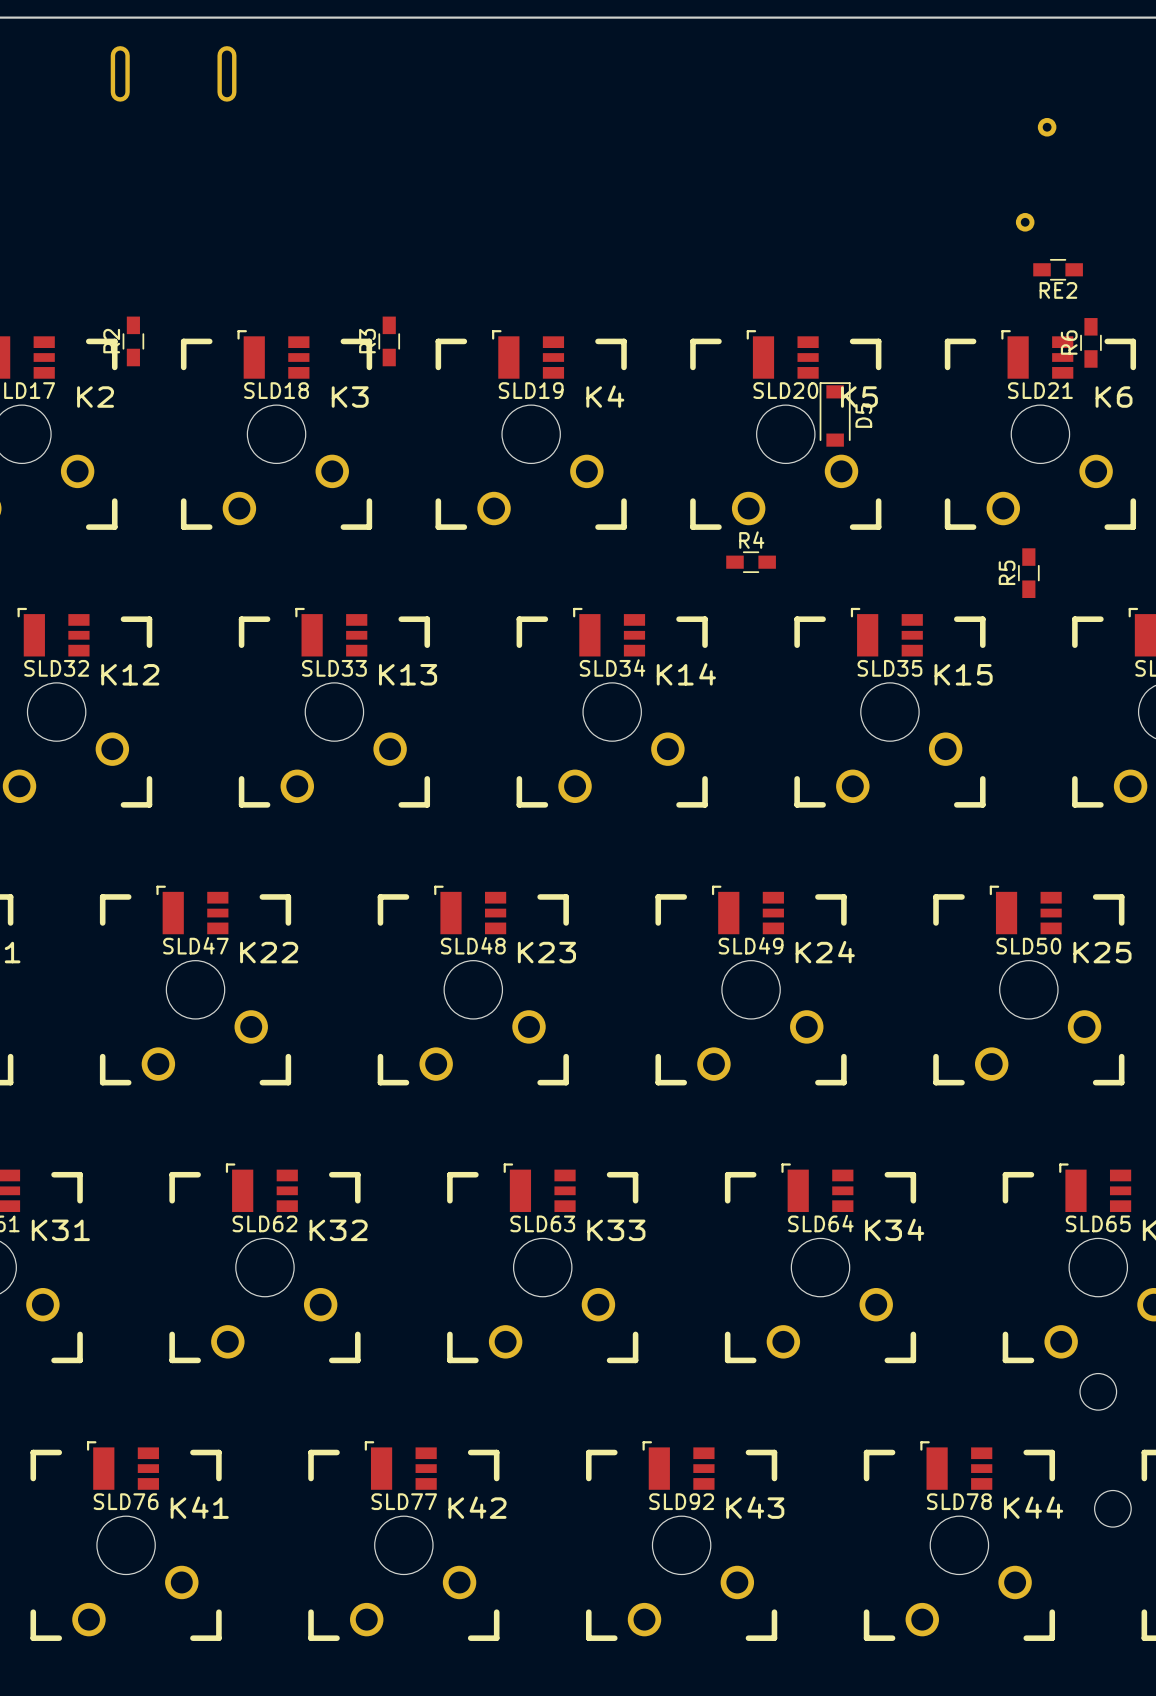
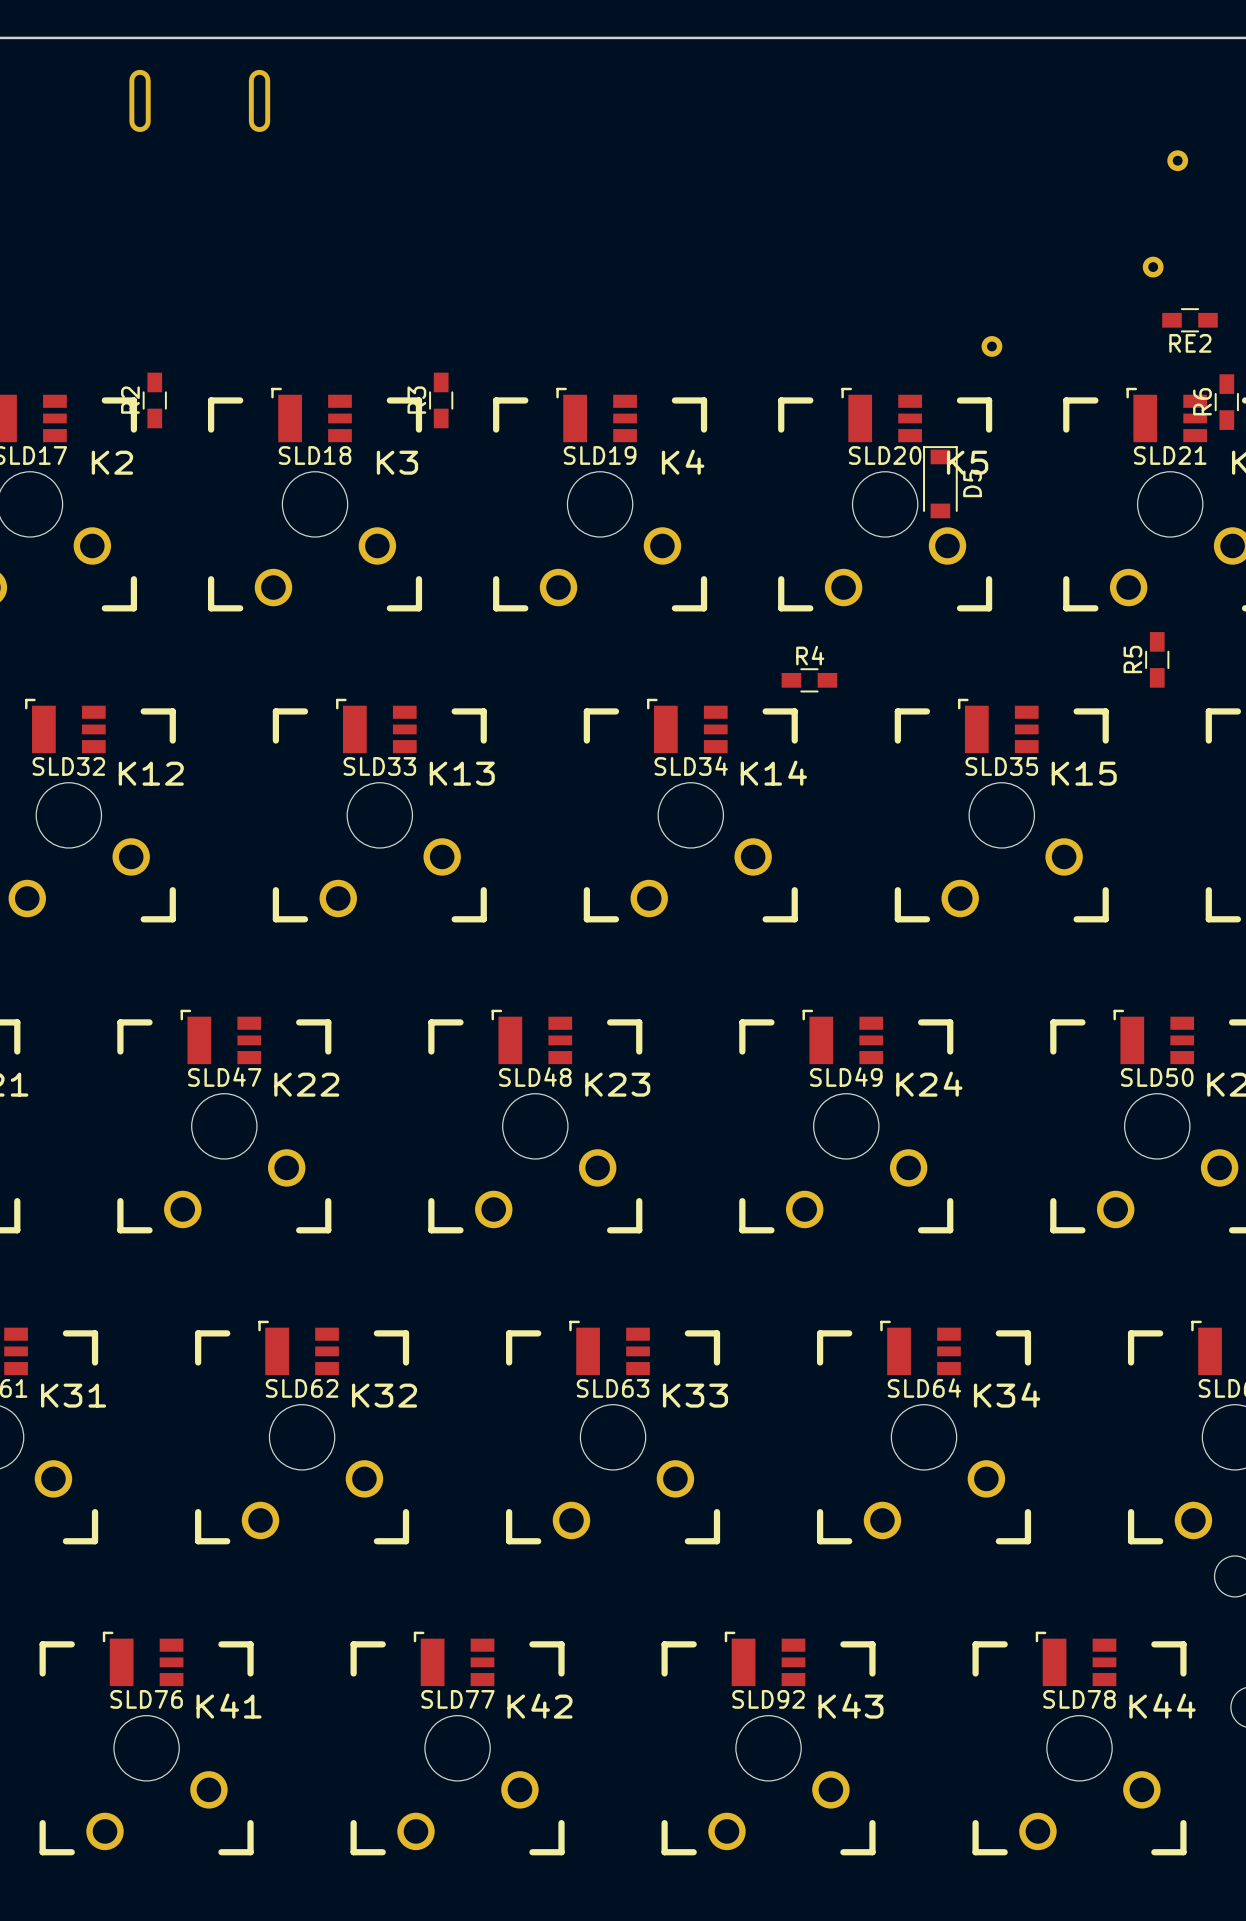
part: none -> (991, 346)
R4 position: (751, 562) -> (809, 680)

